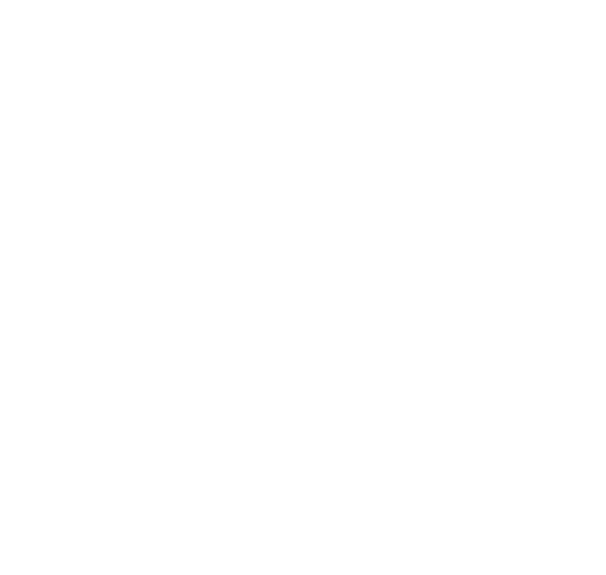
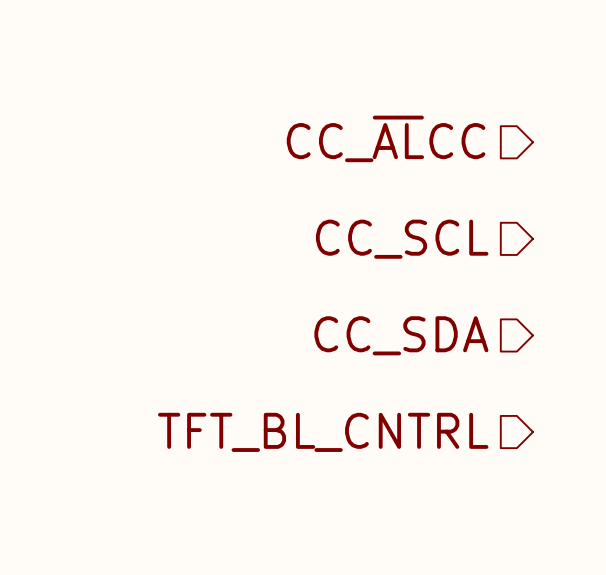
hierarchical label: none -> CC_~{AL}CC (386, 138)
hierarchical label: none -> CC_SCL (402, 239)
hierarchical label: none -> CC_SDA (401, 335)
hierarchical label: none -> TFT_BL_CNTRL (323, 432)

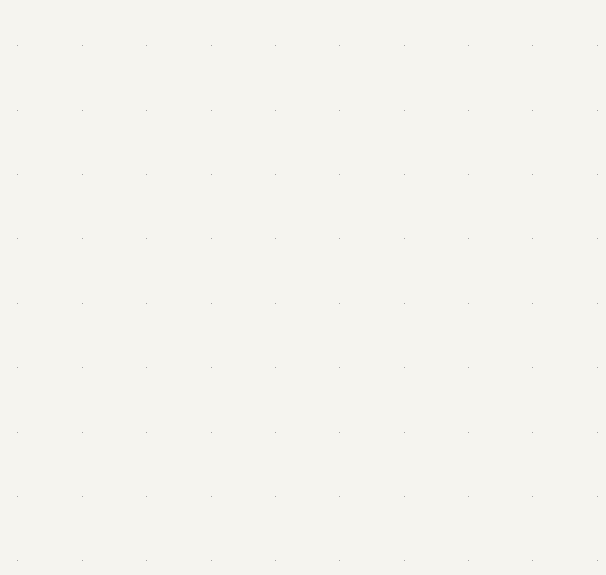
hierarchical label: CC_~{AL}CC (386, 138) -> none
hierarchical label: CC_SCL (402, 239) -> none
hierarchical label: CC_SDA (401, 335) -> none
hierarchical label: TFT_BL_CNTRL (323, 432) -> none

